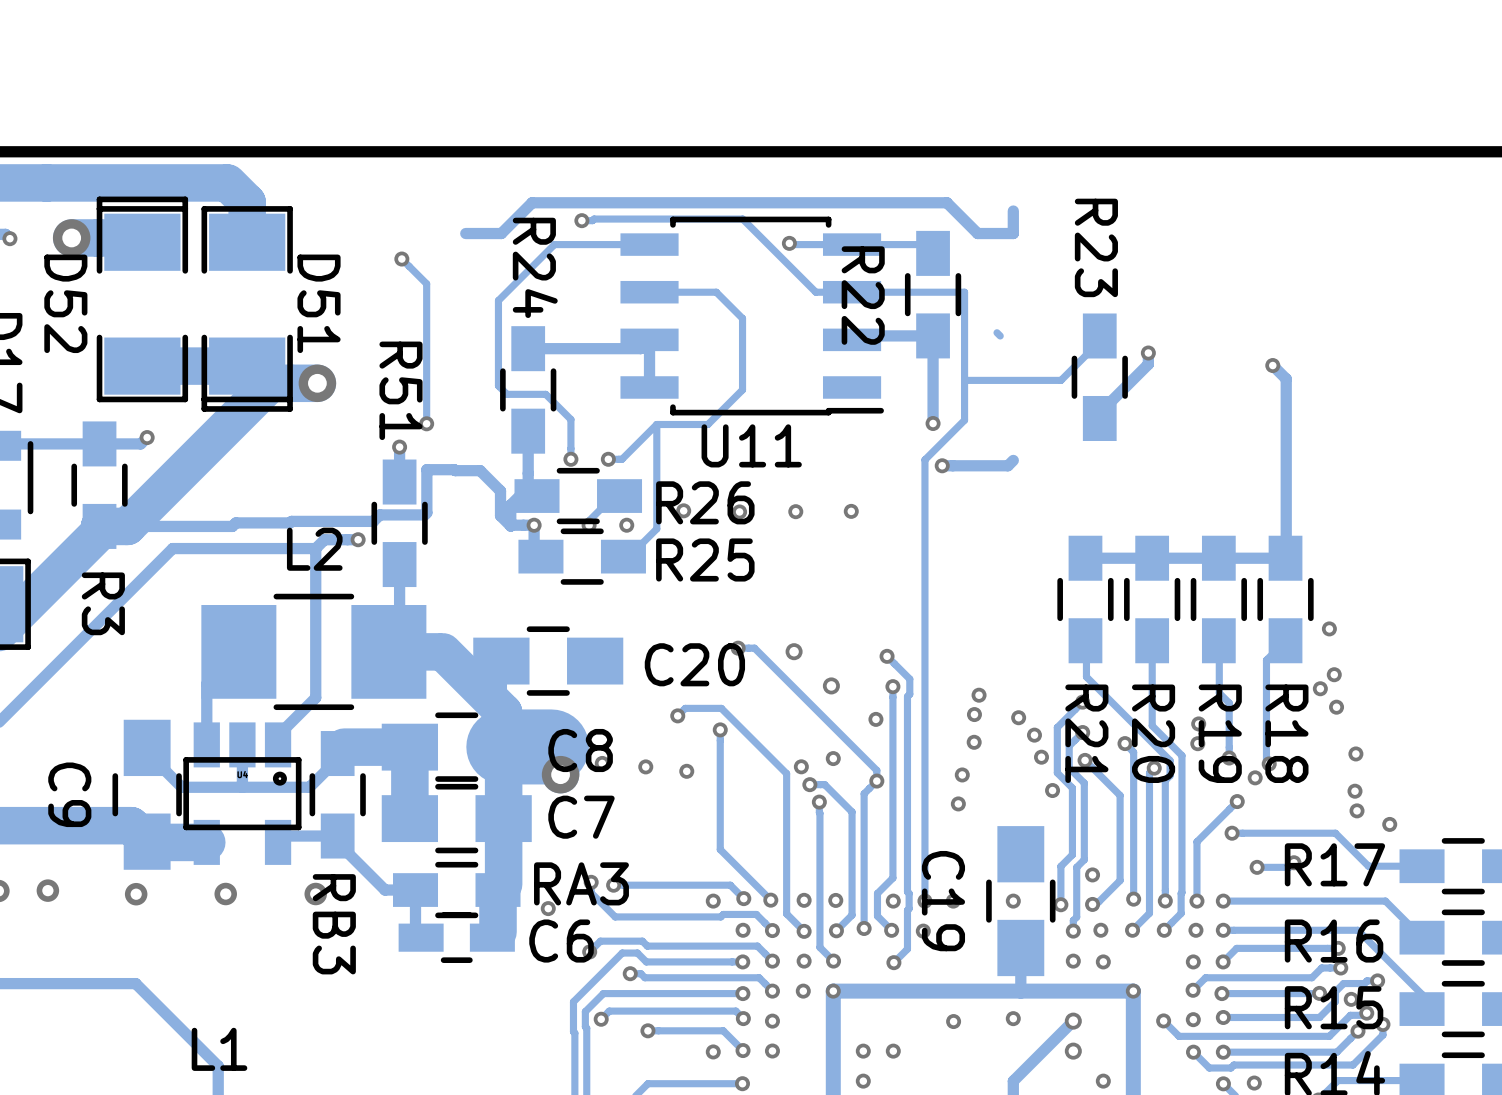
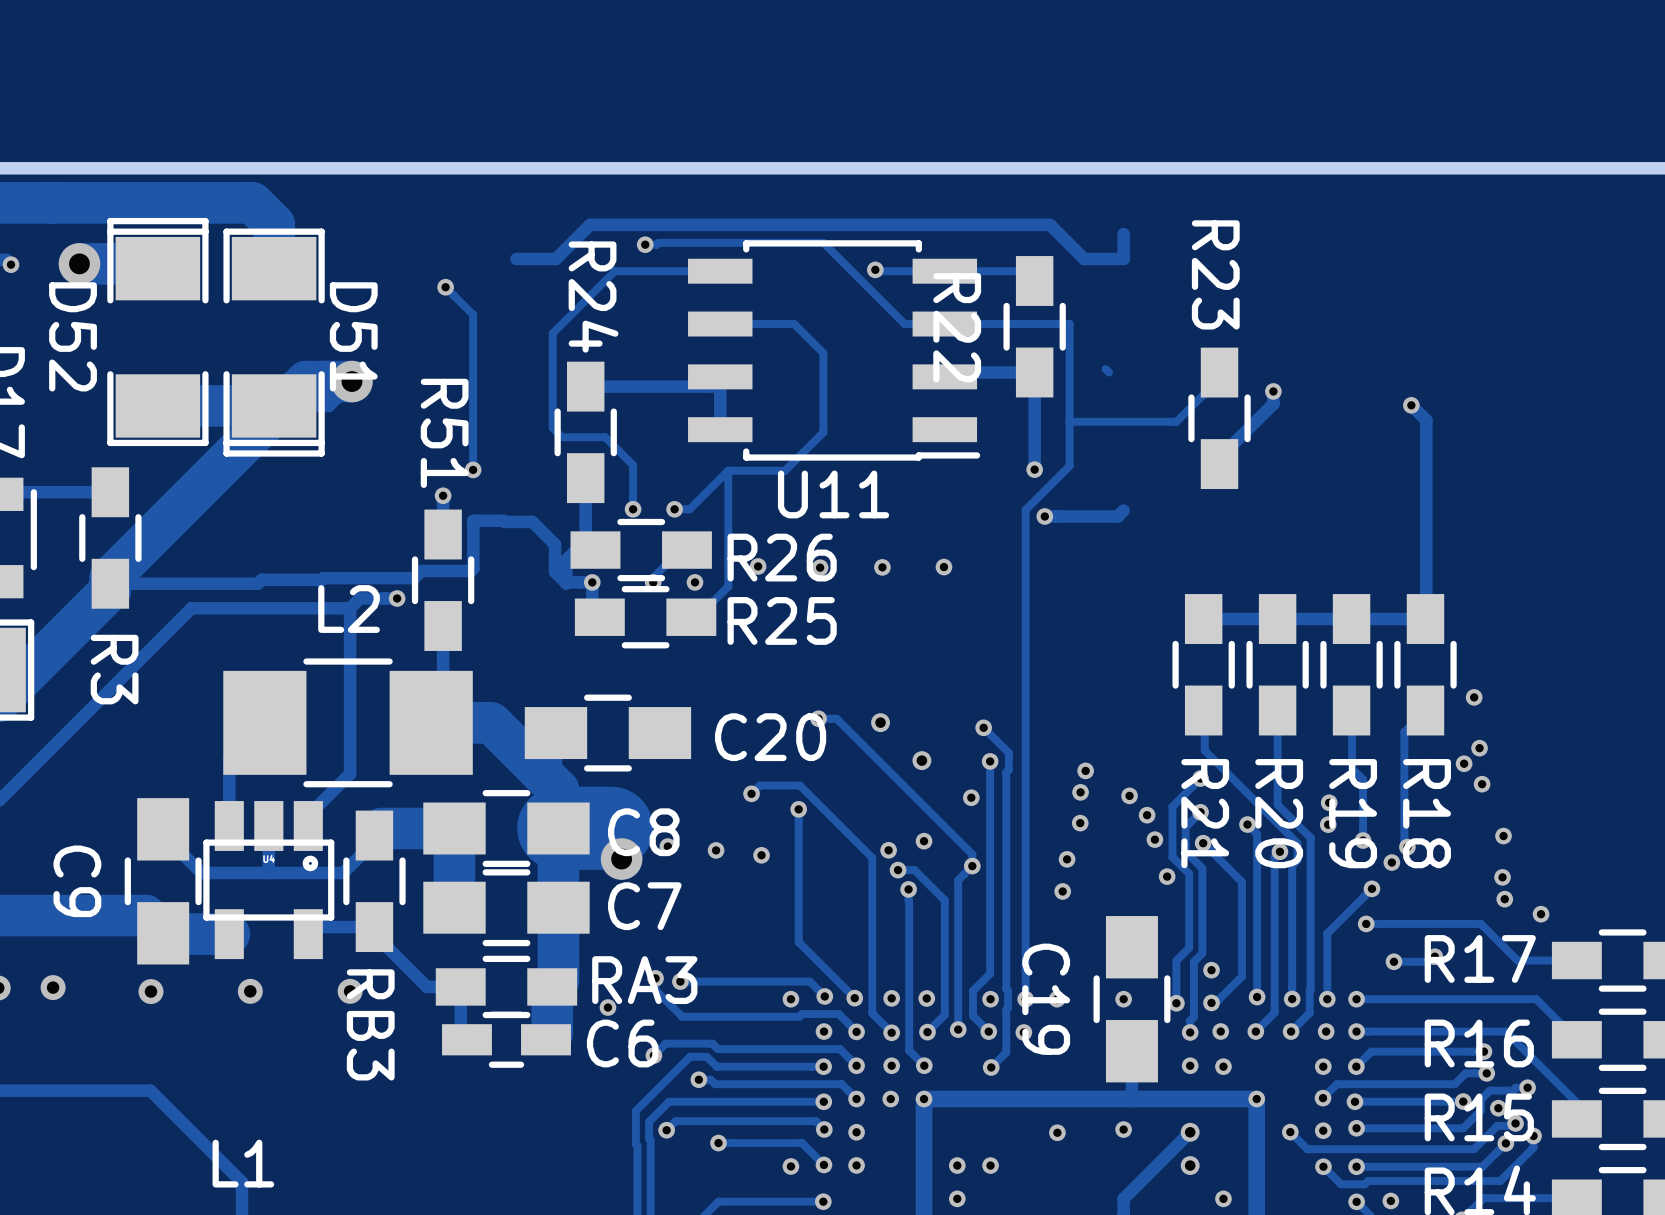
track: (247, 366) (264, 383) (317, 383) (270, 383) (127, 526) (99, 526) -> (274, 405) (328, 405) (351, 381) (306, 381) (110, 577) (110, 583)
via position: (317, 383) -> (351, 381)
track: (147, 437) (140, 443) (99, 443) -> none
via: (147, 437) -> none

